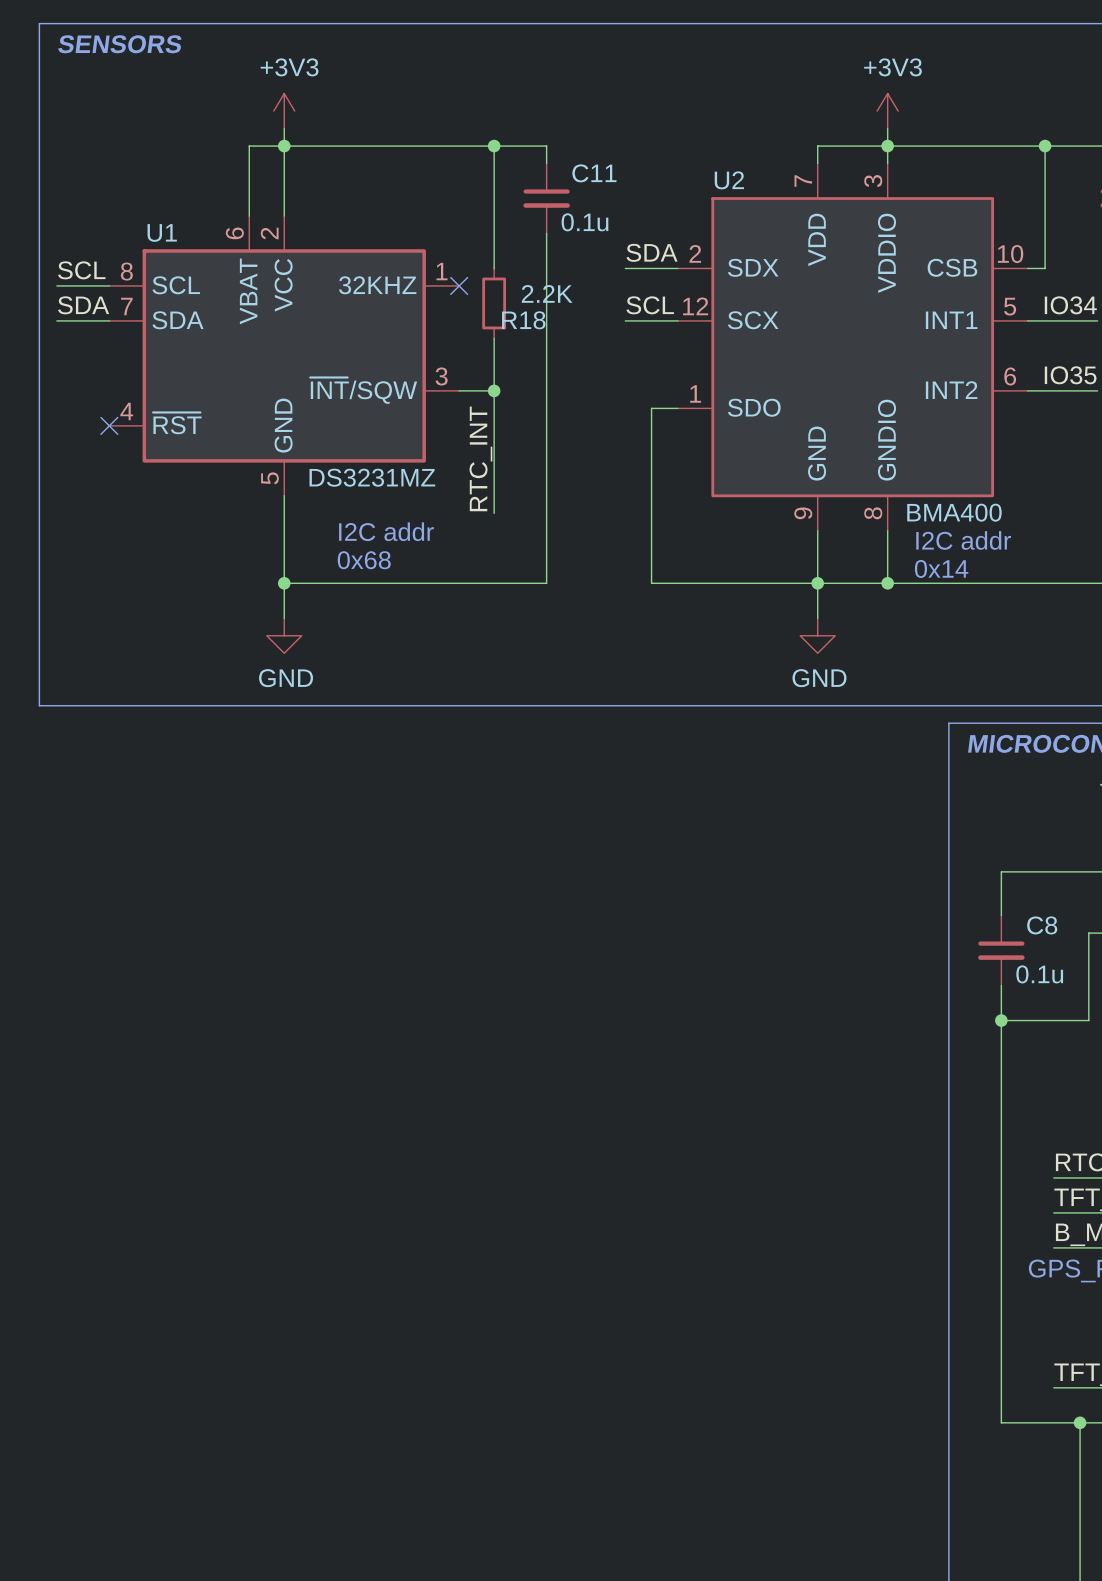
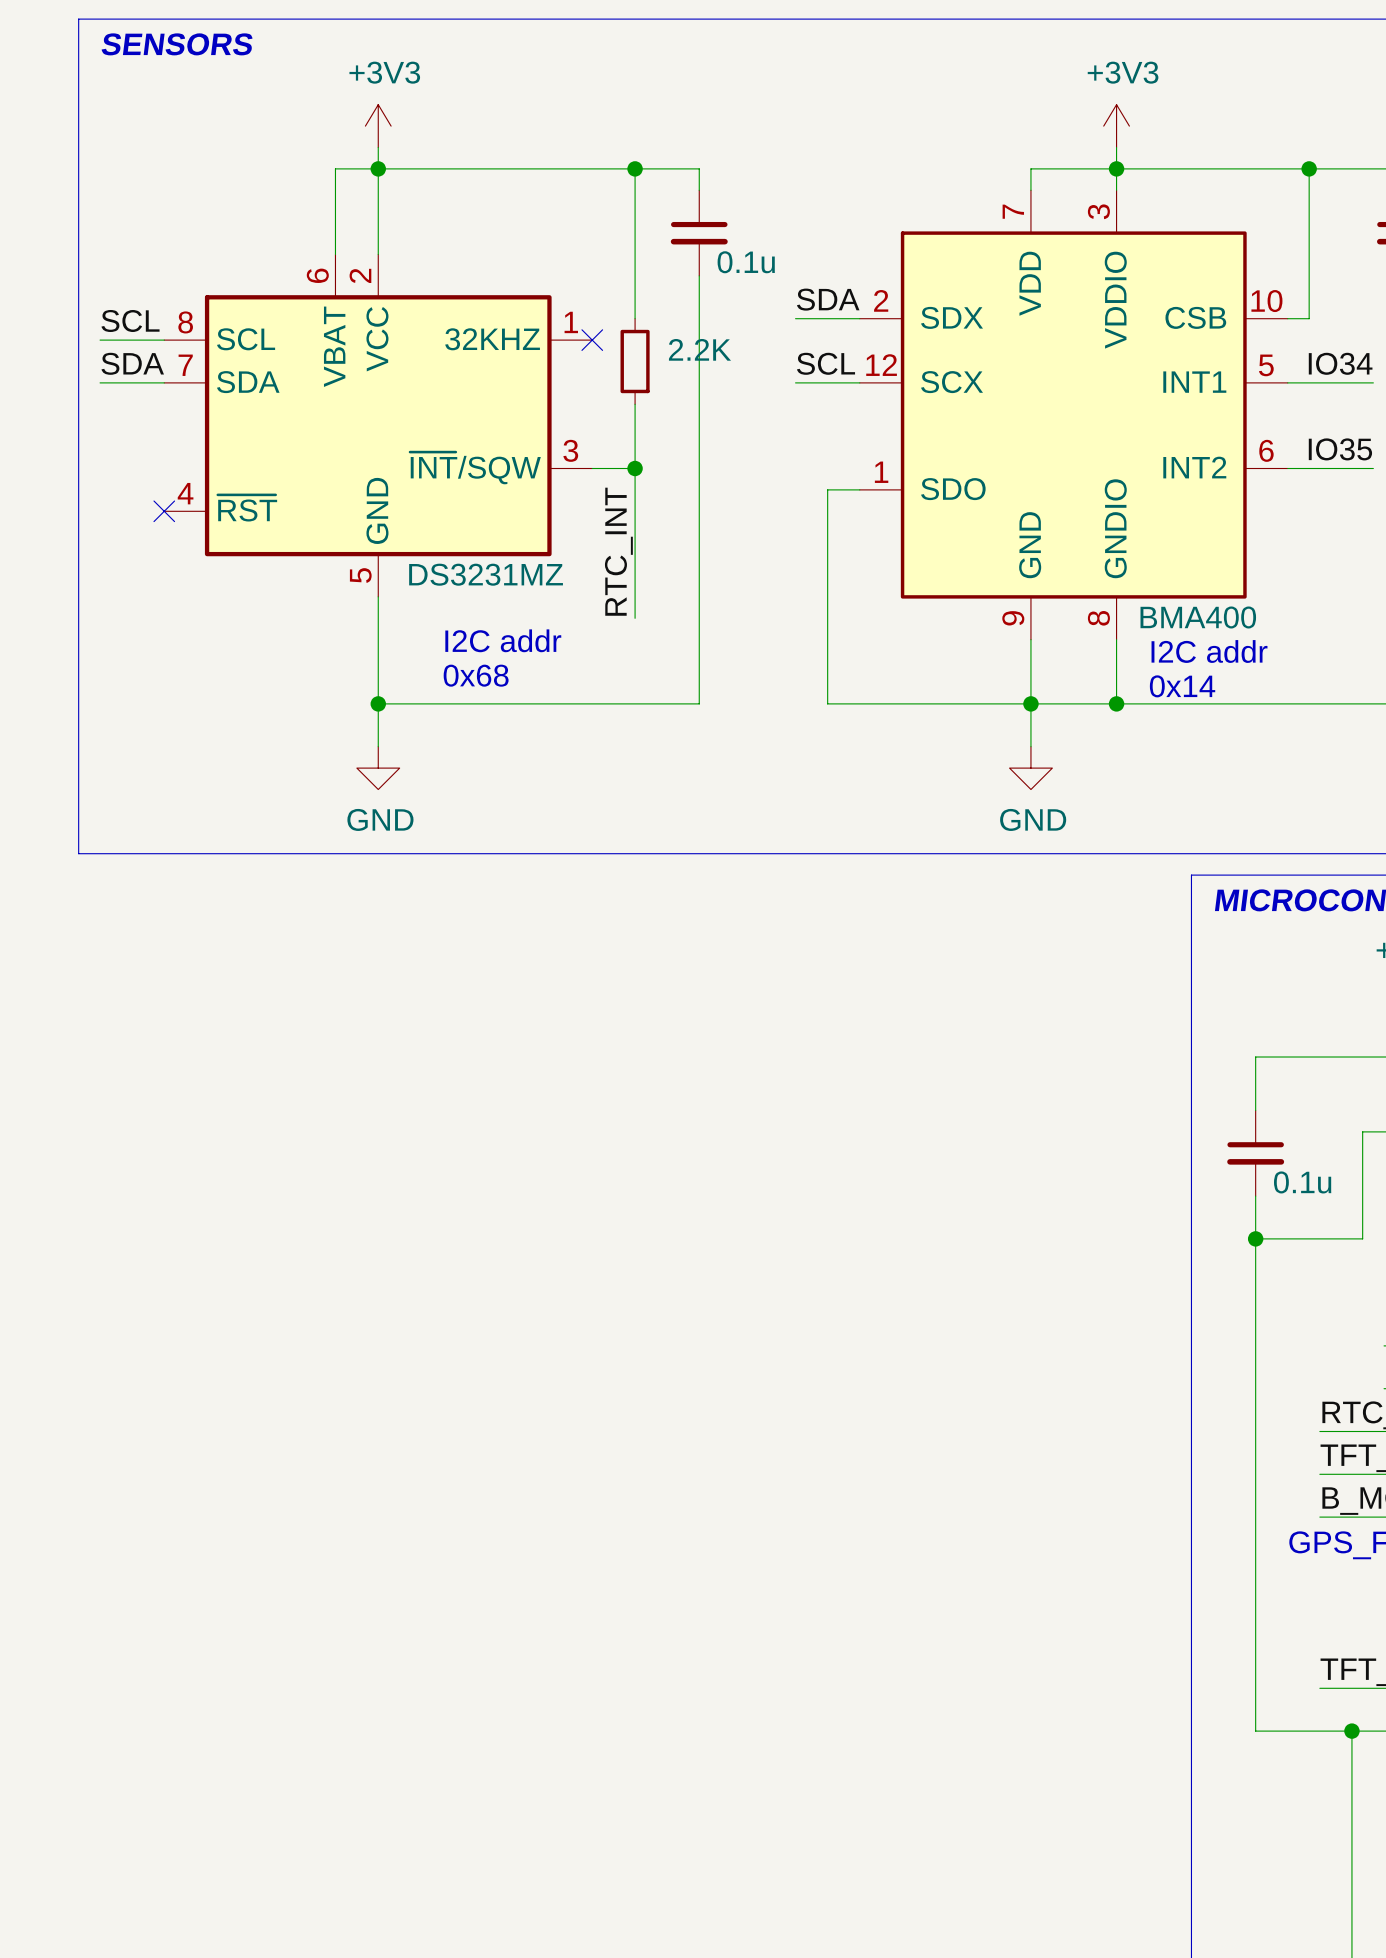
C11 name: C11 (594, 173) -> none
U2 name: U2 (729, 180) -> none
U1 name: U1 (162, 232) -> none
R18 name: R18 (523, 320) -> none
C8 name: C8 (1042, 925) -> none

